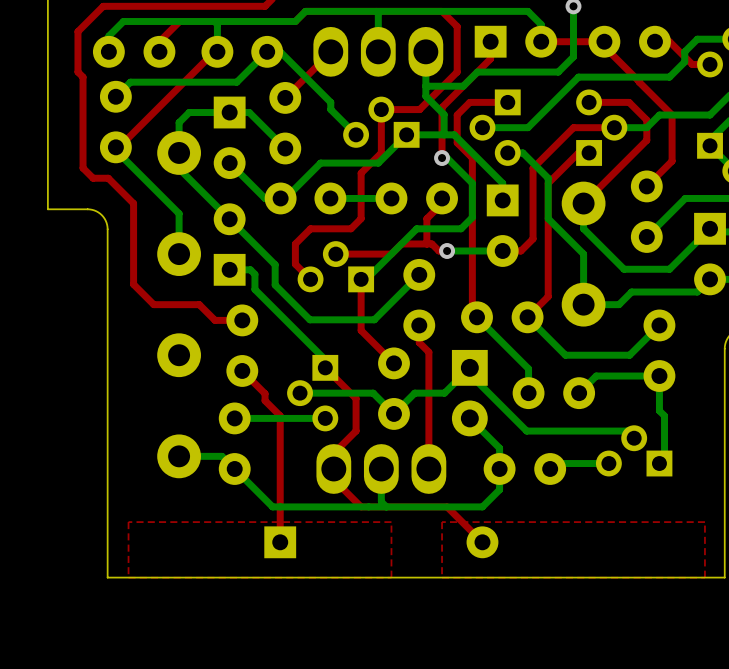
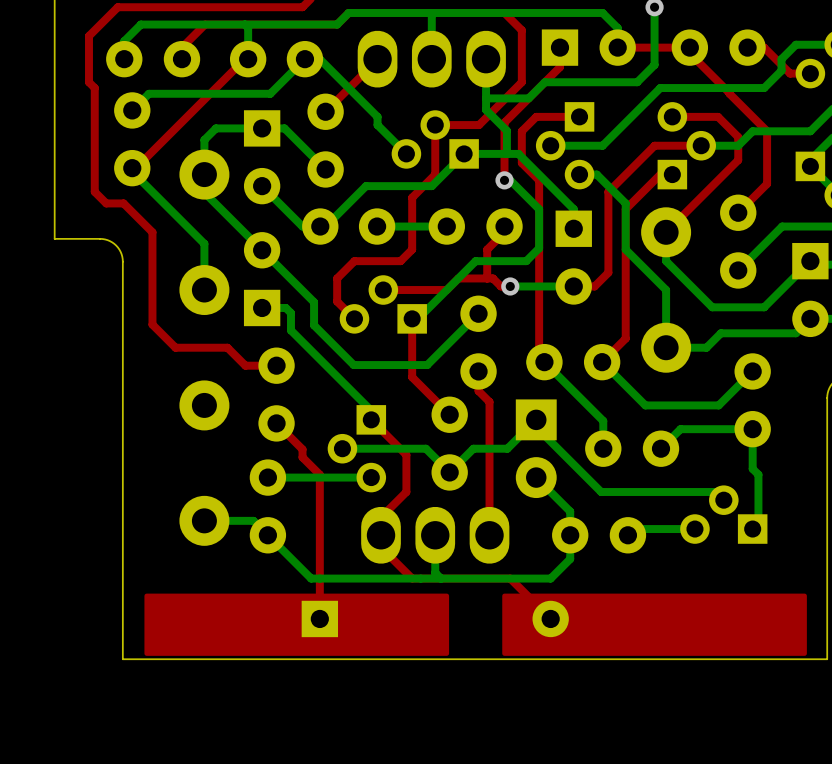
drawing: none -> [144, 593, 450, 656]
drawing: none -> [502, 593, 807, 656]
top zone outline: (391, 522) (391, 577) (128, 577) (128, 522) (391, 522) -> none
top zone outline: (704, 522) (442, 522) (442, 577) (704, 577) (704, 522) -> none

